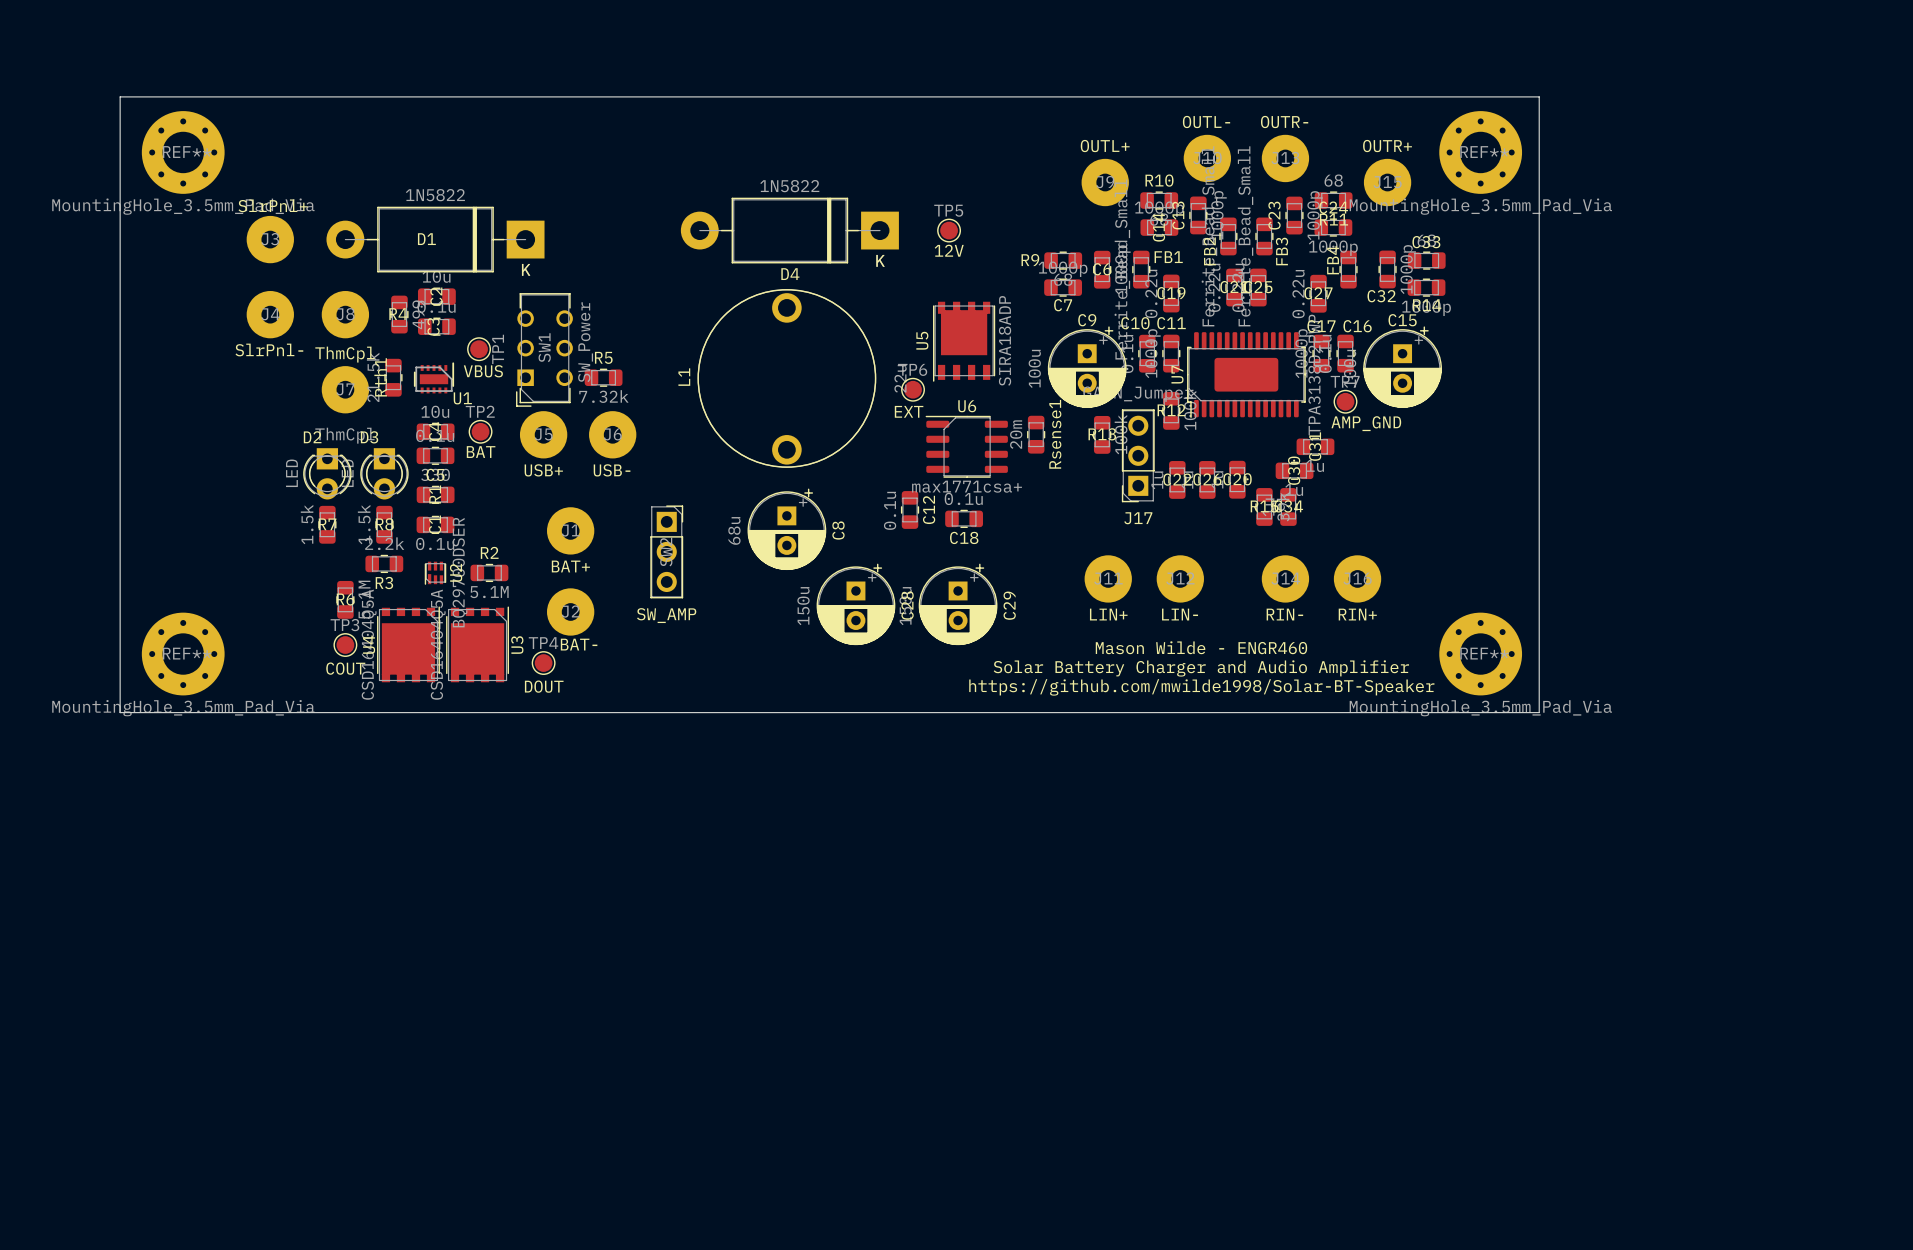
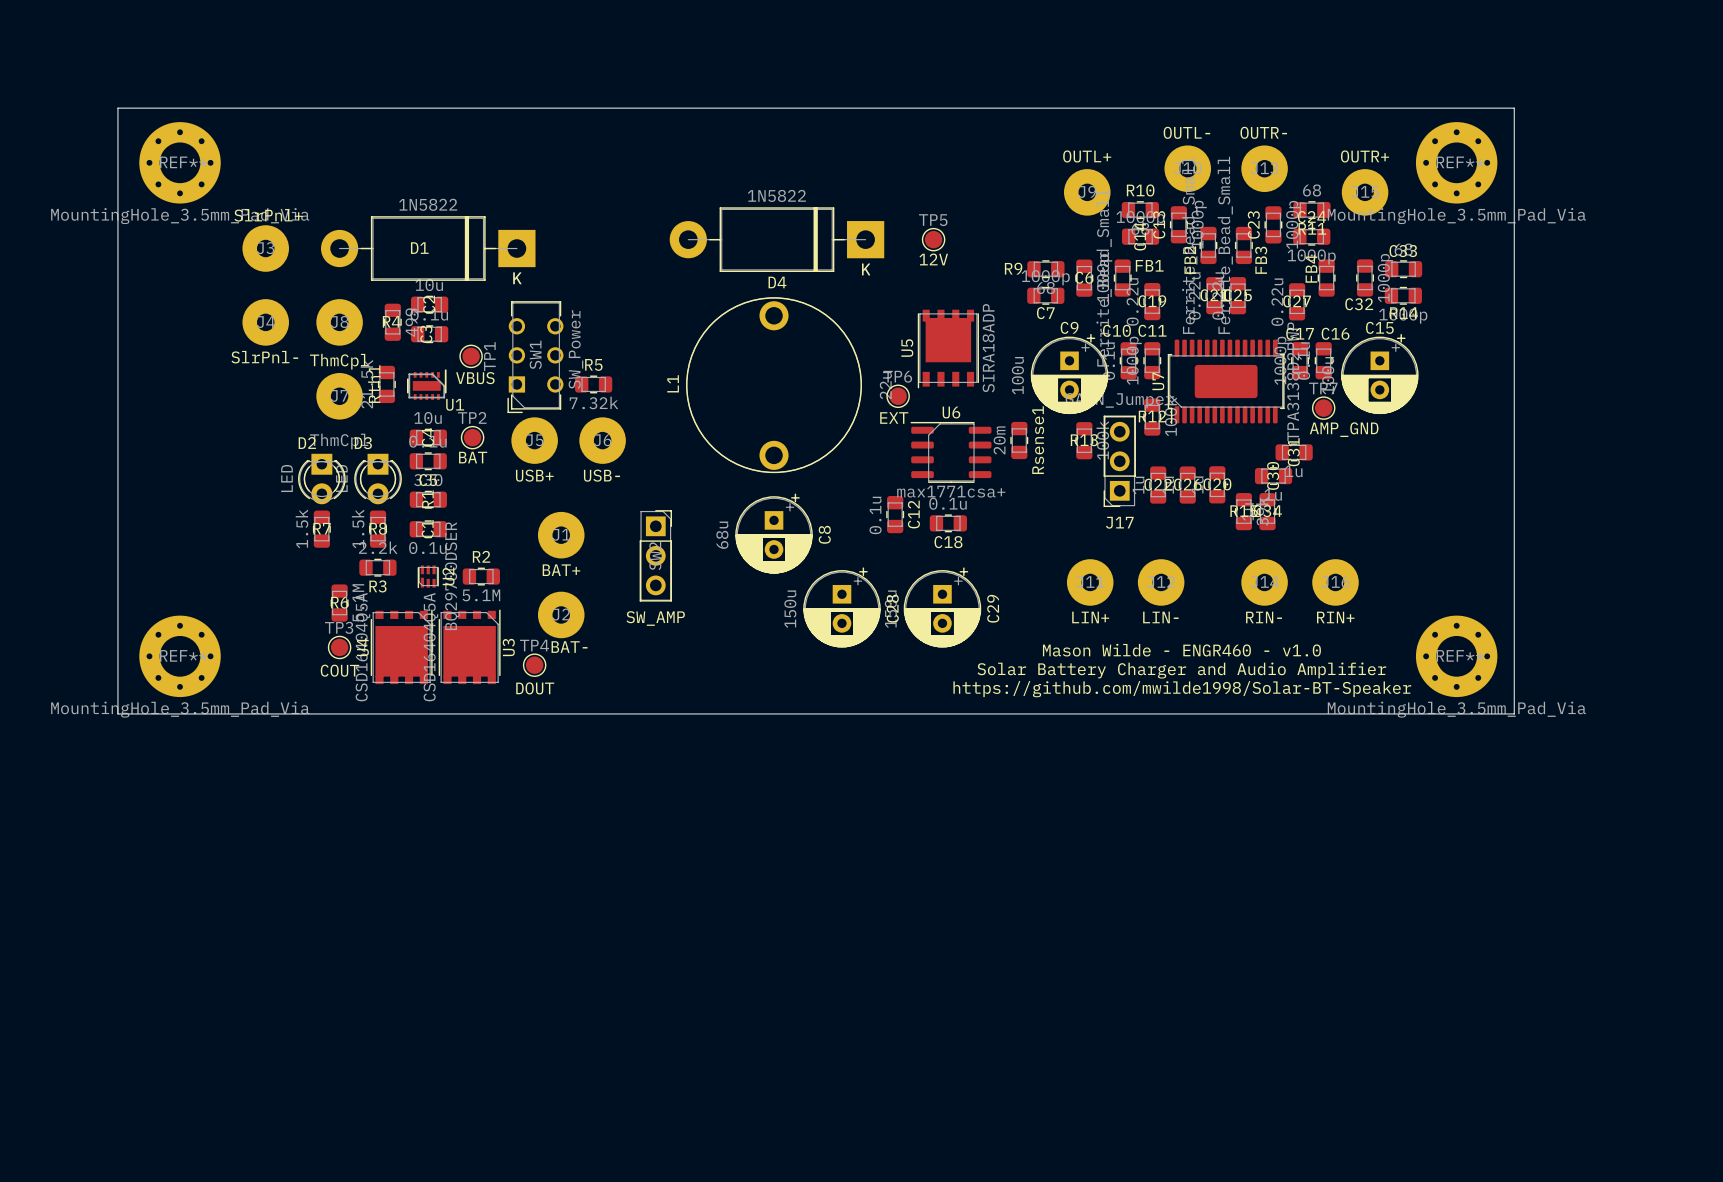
text: Mason Wilde - ENGR460 (1201, 647) -> Mason Wilde - ENGR460 - v1.0 (1181, 650)

